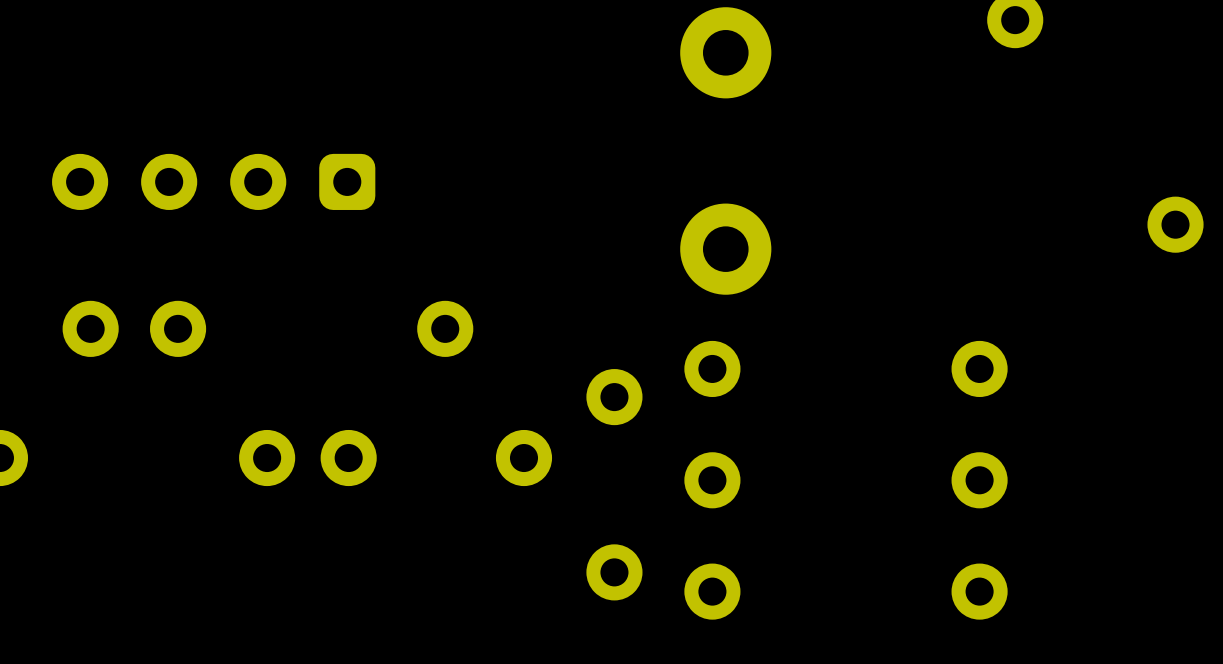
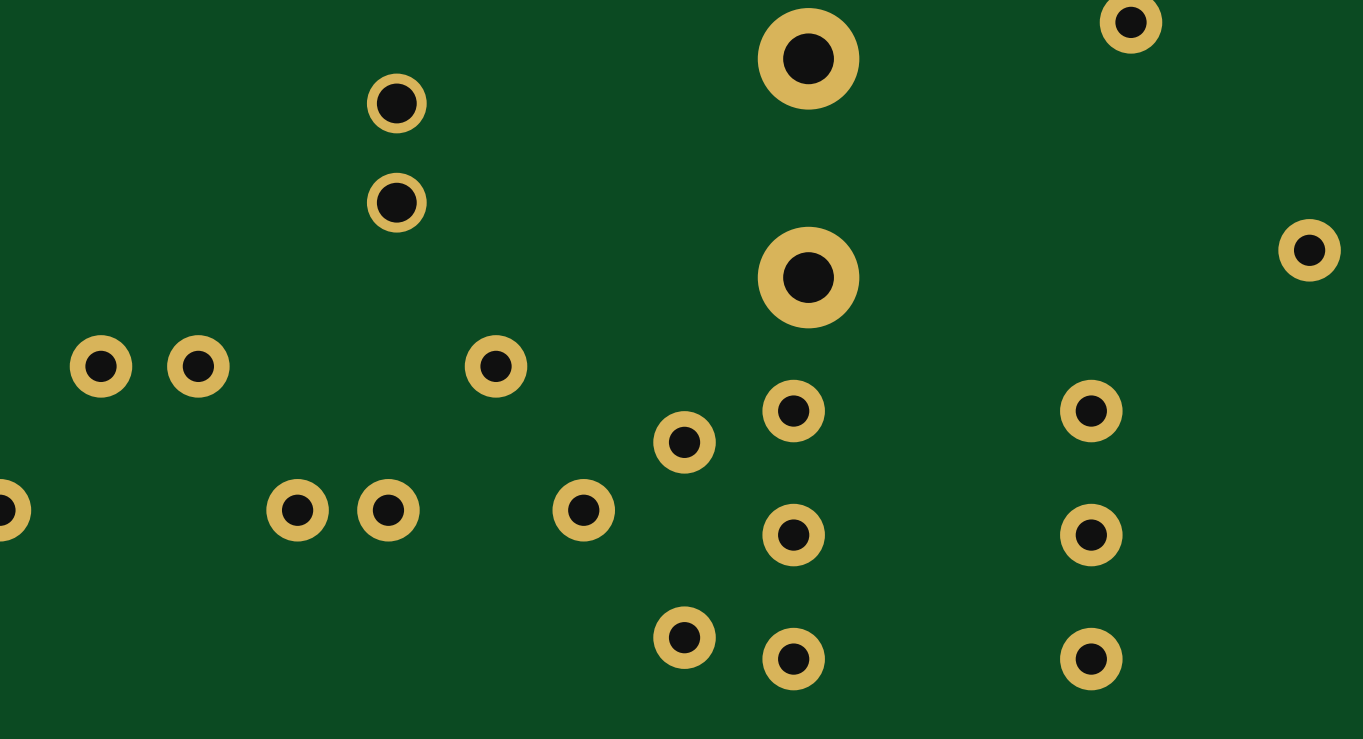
part: none -> (396, 153)
part: (213, 181) -> none

